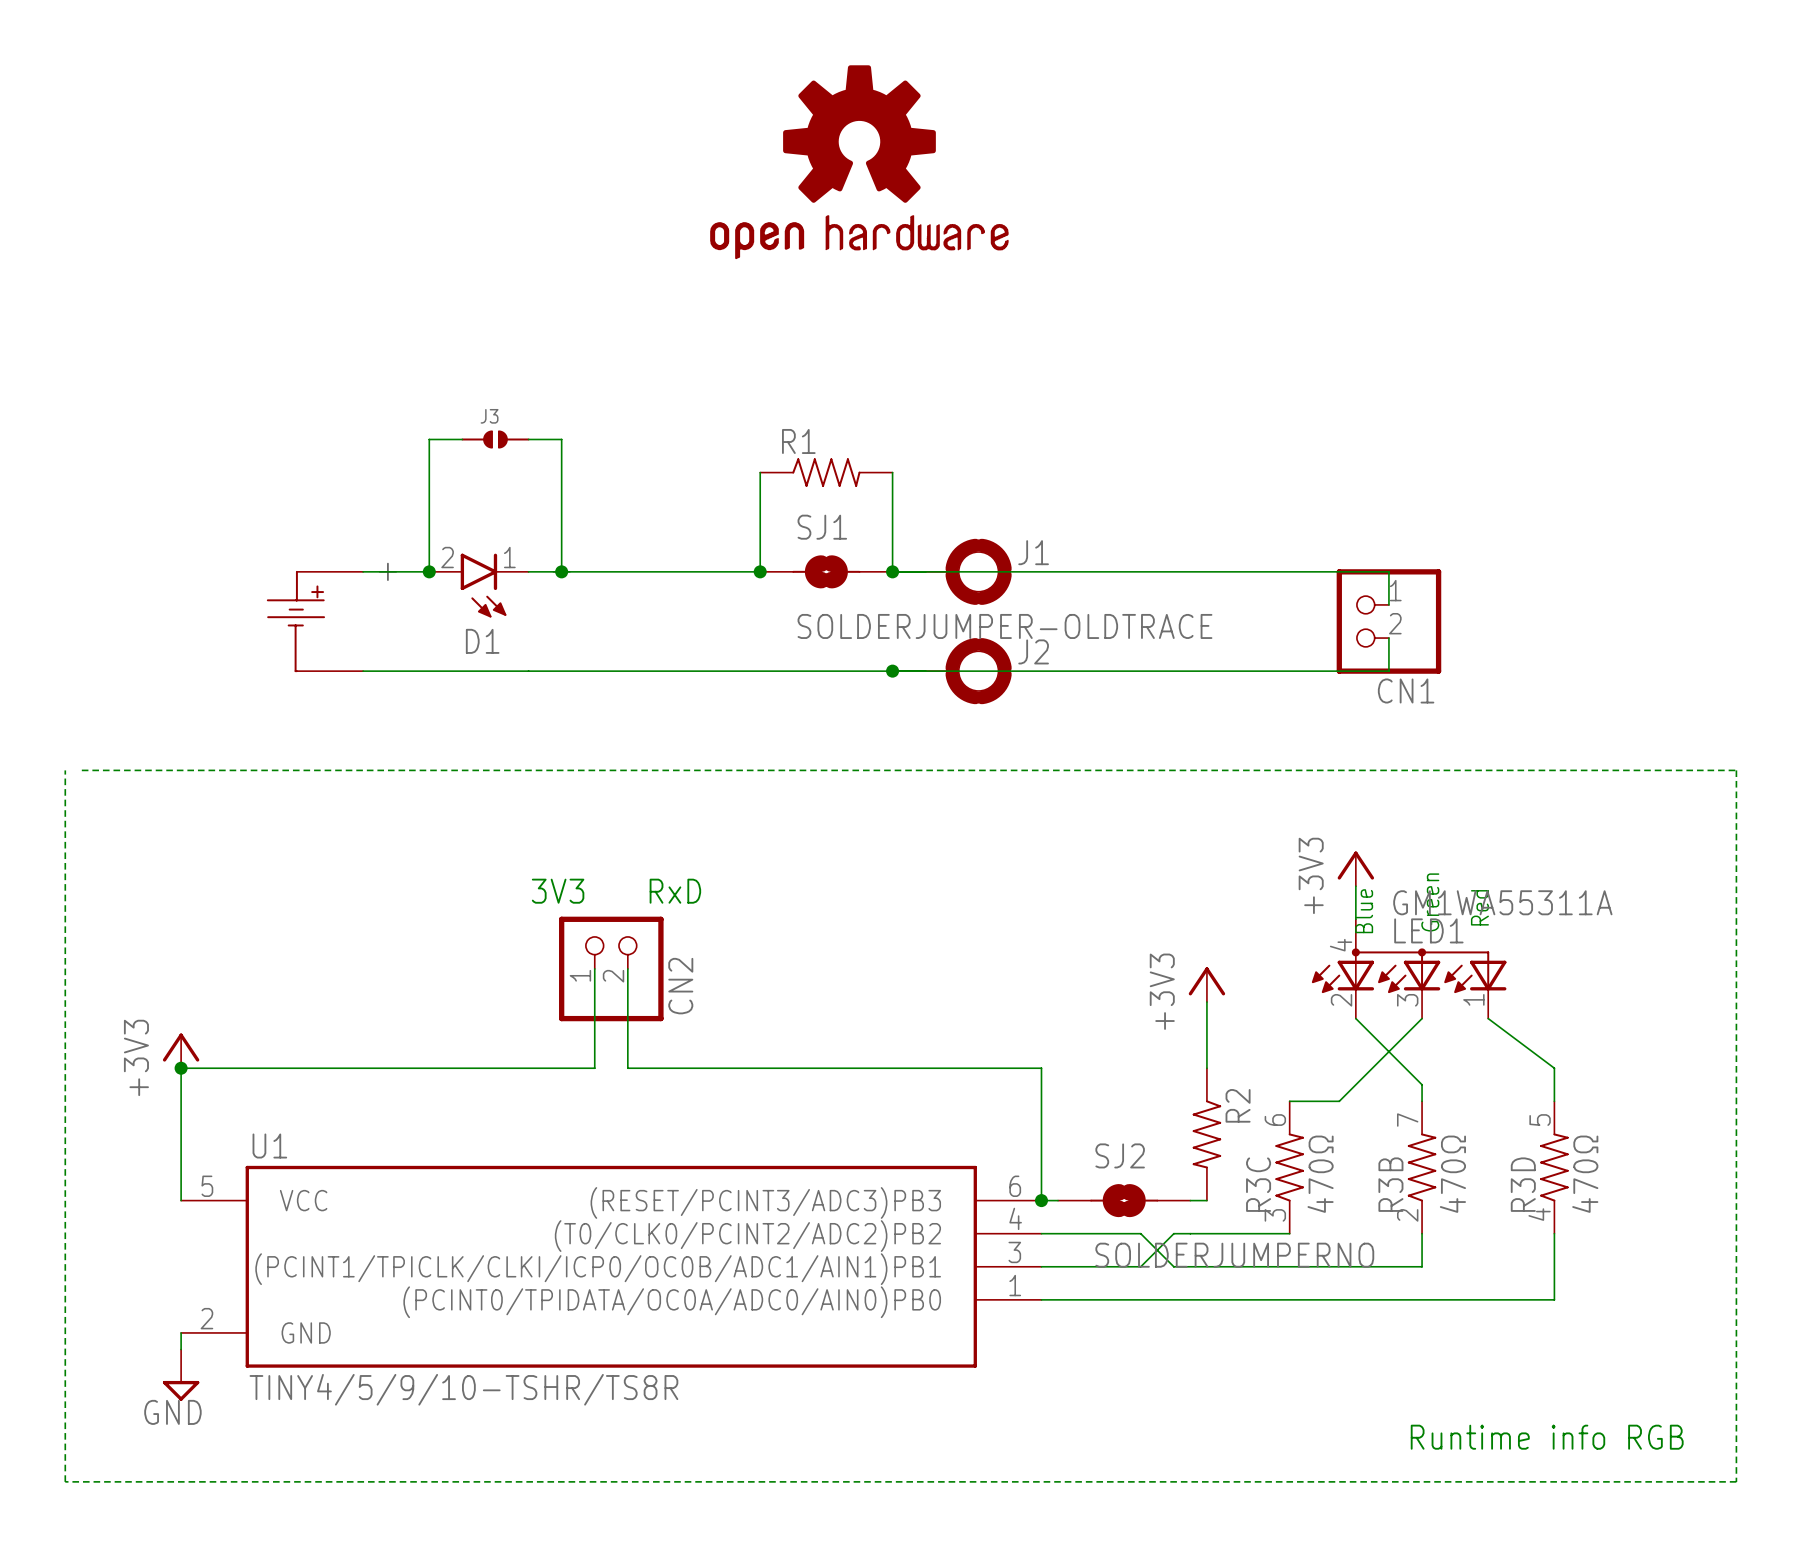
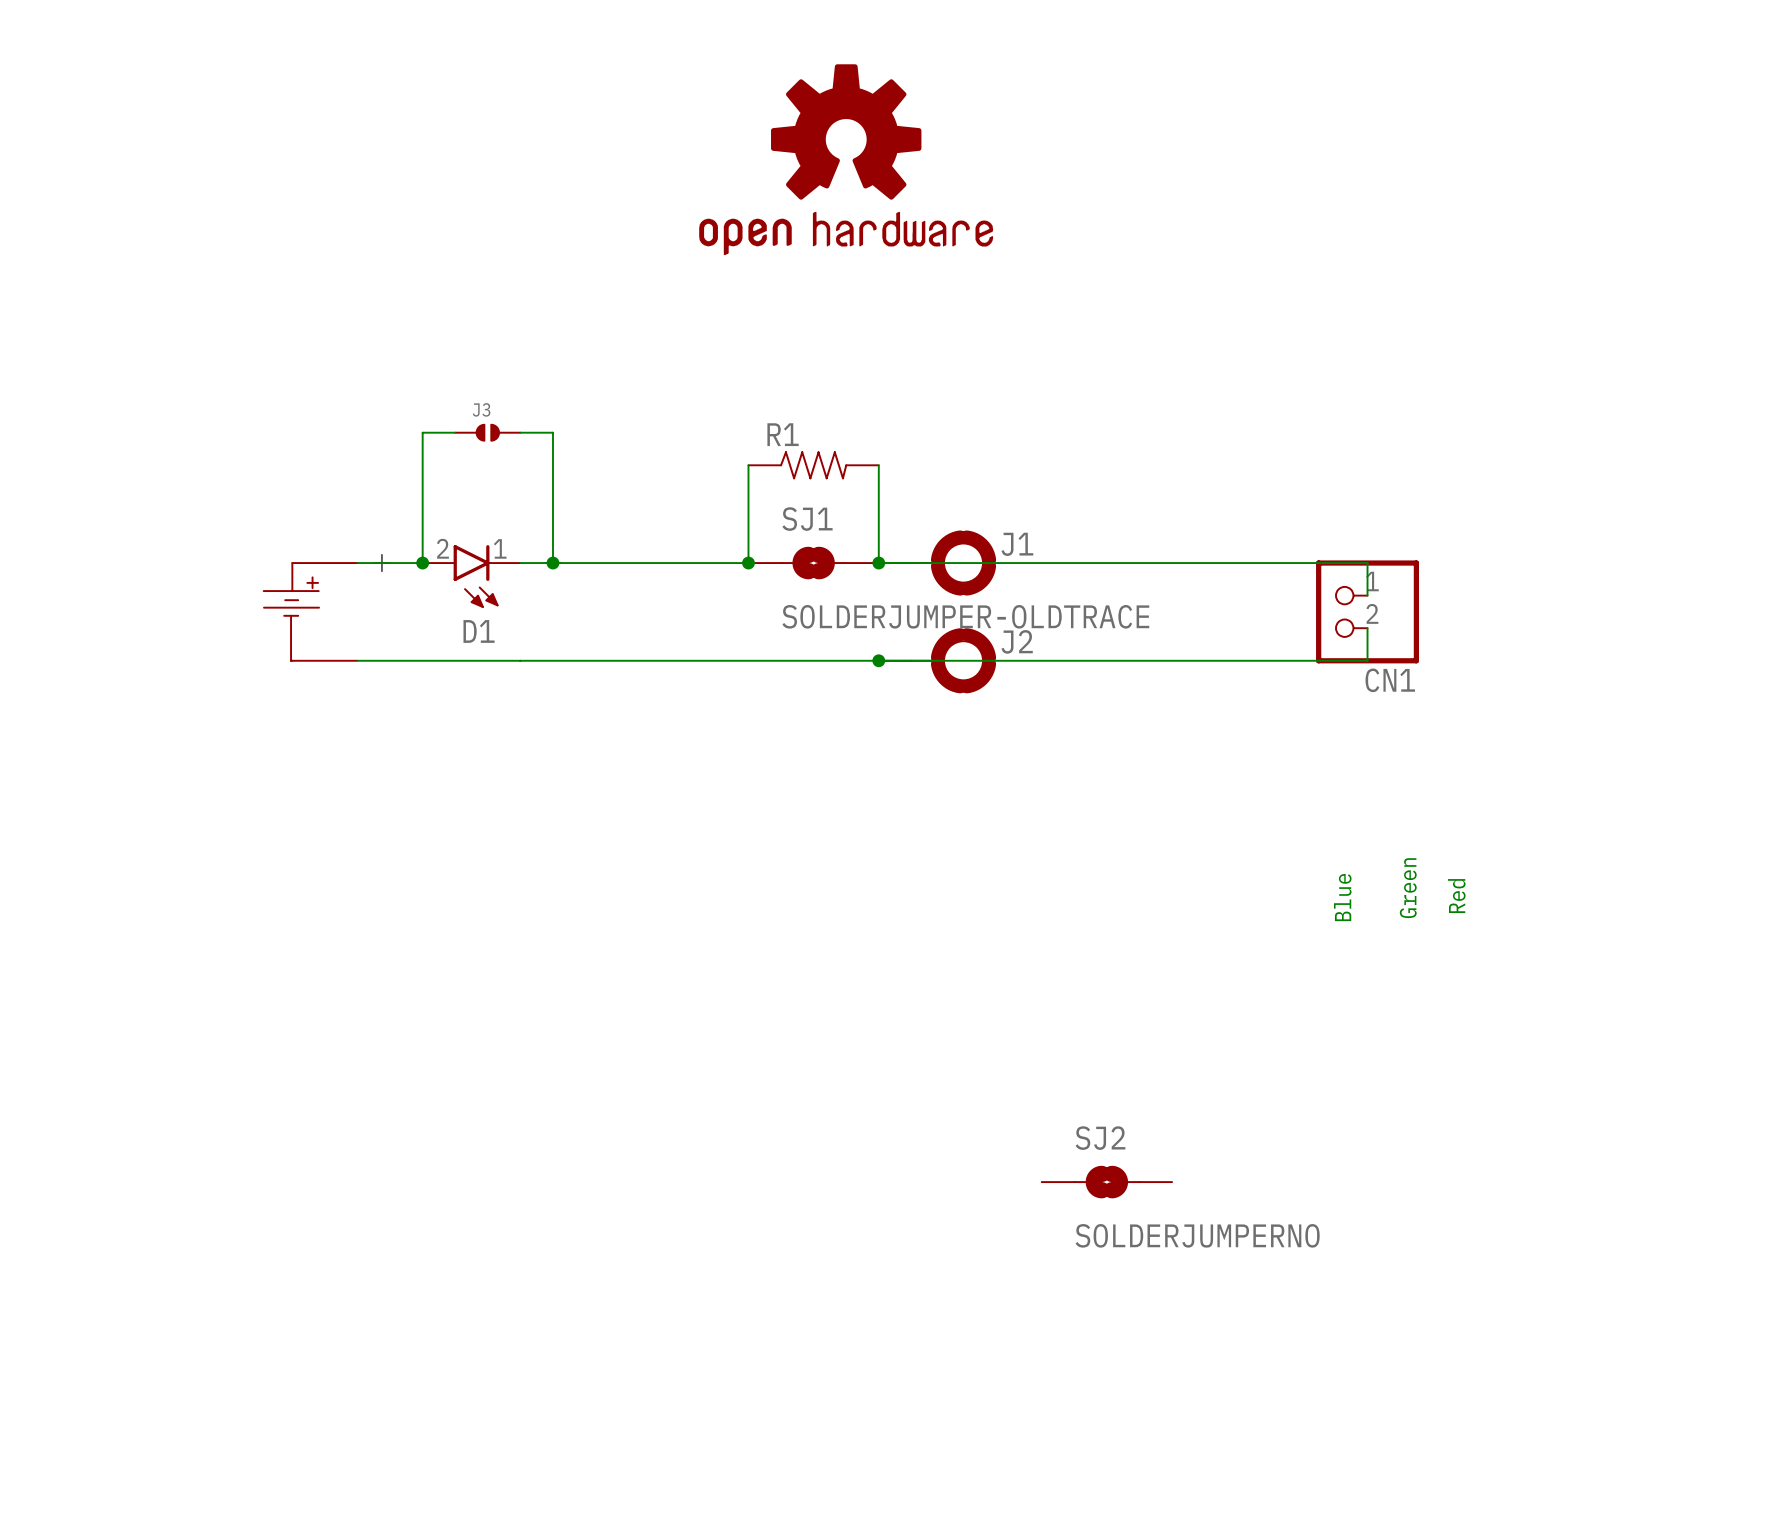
wire: (65, 770) (65, 1481) (1736, 1481) (1736, 770) (81, 770) -> none
power symbol: +3V3 (1355, 868) -> none
wire: (1355, 886) (1355, 919) -> none
text: 3V3 (558, 891) -> none
text: RxD (675, 891) -> none
wire: (594, 968) (594, 1068) (181, 1068) (181, 1200) -> none
CN2: (611, 968) -> none
wire: (627, 968) (627, 1068) (1041, 1068) (1041, 1200) (1058, 1200) -> none
LED1: GM1WA55311A (1409, 968) -> none
power symbol: +3V3 (1206, 984) -> none
wire: (1206, 1002) (1206, 1068) -> none
wire: (1355, 1018) (1422, 1084) (1422, 1101) -> none
wire: (1422, 1018) (1339, 1101) (1289, 1101) -> none
wire: (1488, 1018) (1554, 1068) (1554, 1101) -> none
power symbol: +3V3 (181, 1050) -> none
junction: (181, 1068) -> none
R2: (1206, 1134) -> none
R3C: 470Ω (1289, 1167) -> none
R3B: 470Ω (1422, 1167) -> none
R3D: 470Ω (1554, 1167) -> none
junction: (1041, 1200) -> none
wire: (1190, 1200) (1206, 1200) -> none
wire: (1041, 1233) (1140, 1233) (1173, 1266) (1422, 1266) (1422, 1233) -> none
wire: (1289, 1233) (1173, 1233) (1140, 1266) (1041, 1266) -> none
wire: (1554, 1233) (1554, 1299) (1041, 1299) -> none
U1: TINY4/5/9/10-TSHR/TS8R (611, 1266) -> none
wire: (181, 1332) (181, 1349) -> none
power symbol: GND (181, 1375) -> none
text: Runtime info RGB (1547, 1437) -> none

